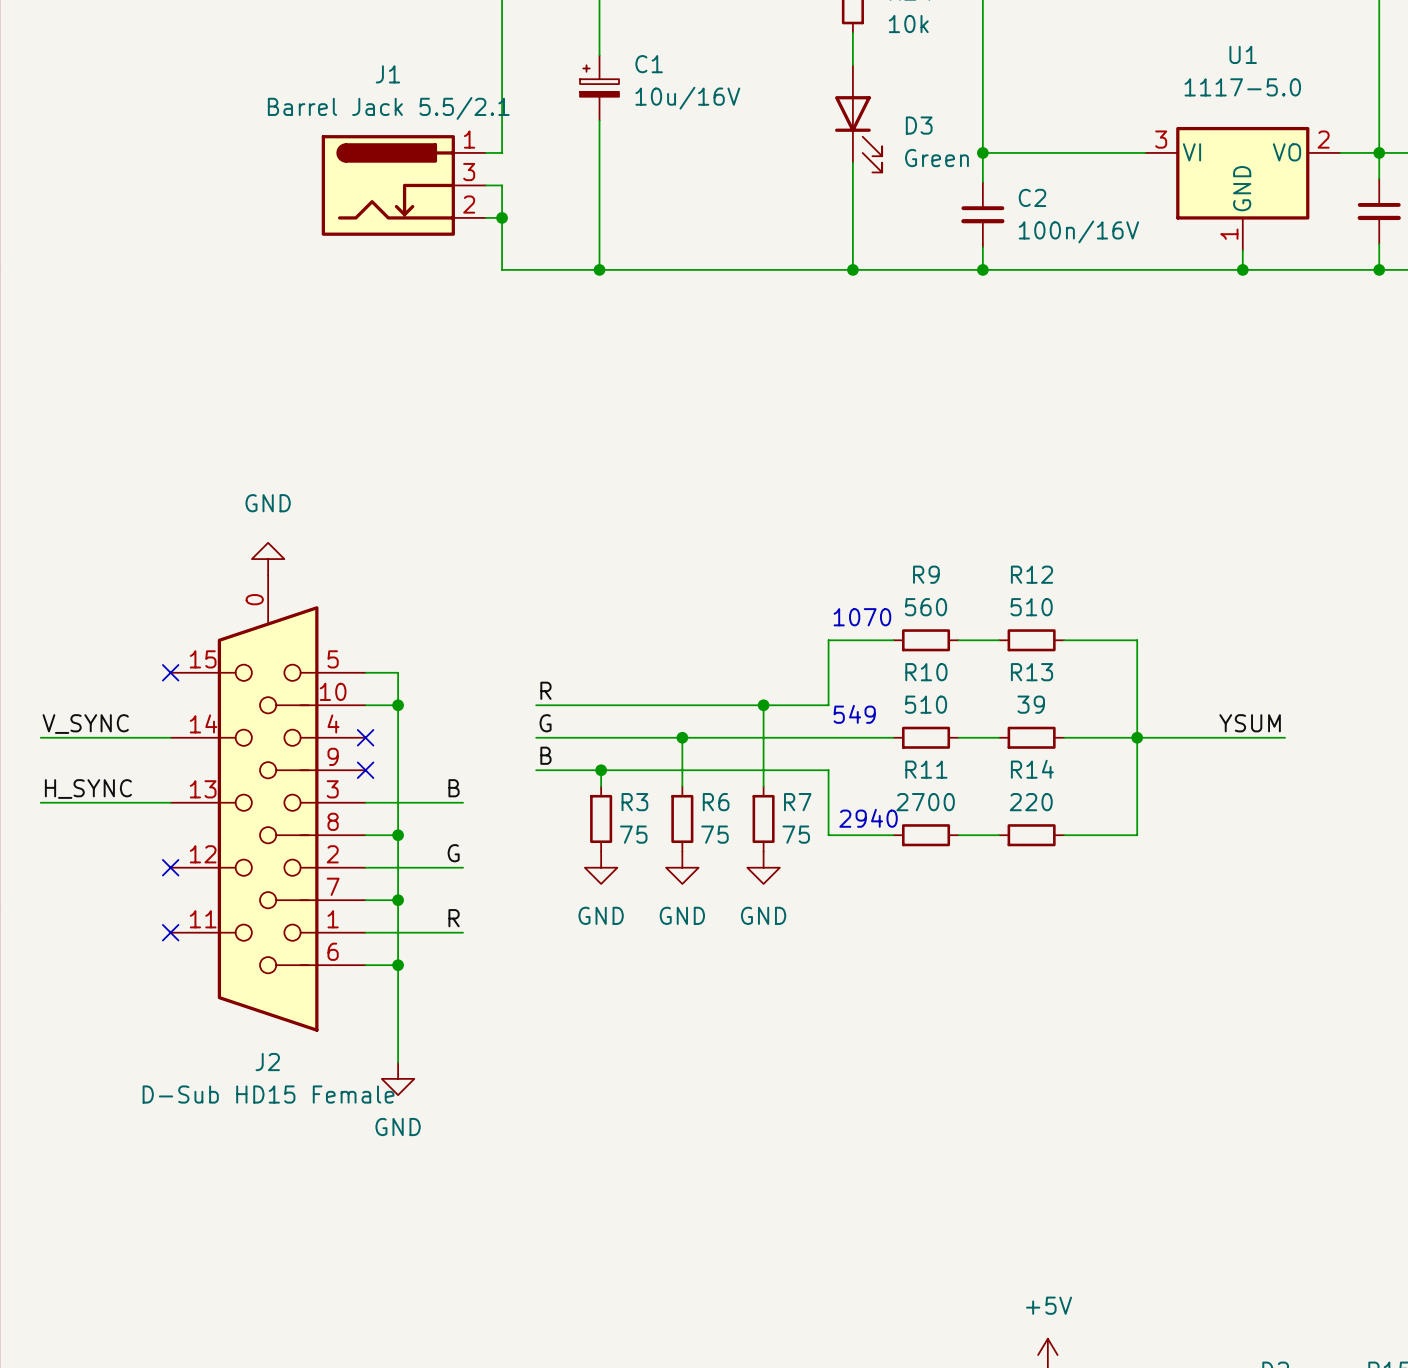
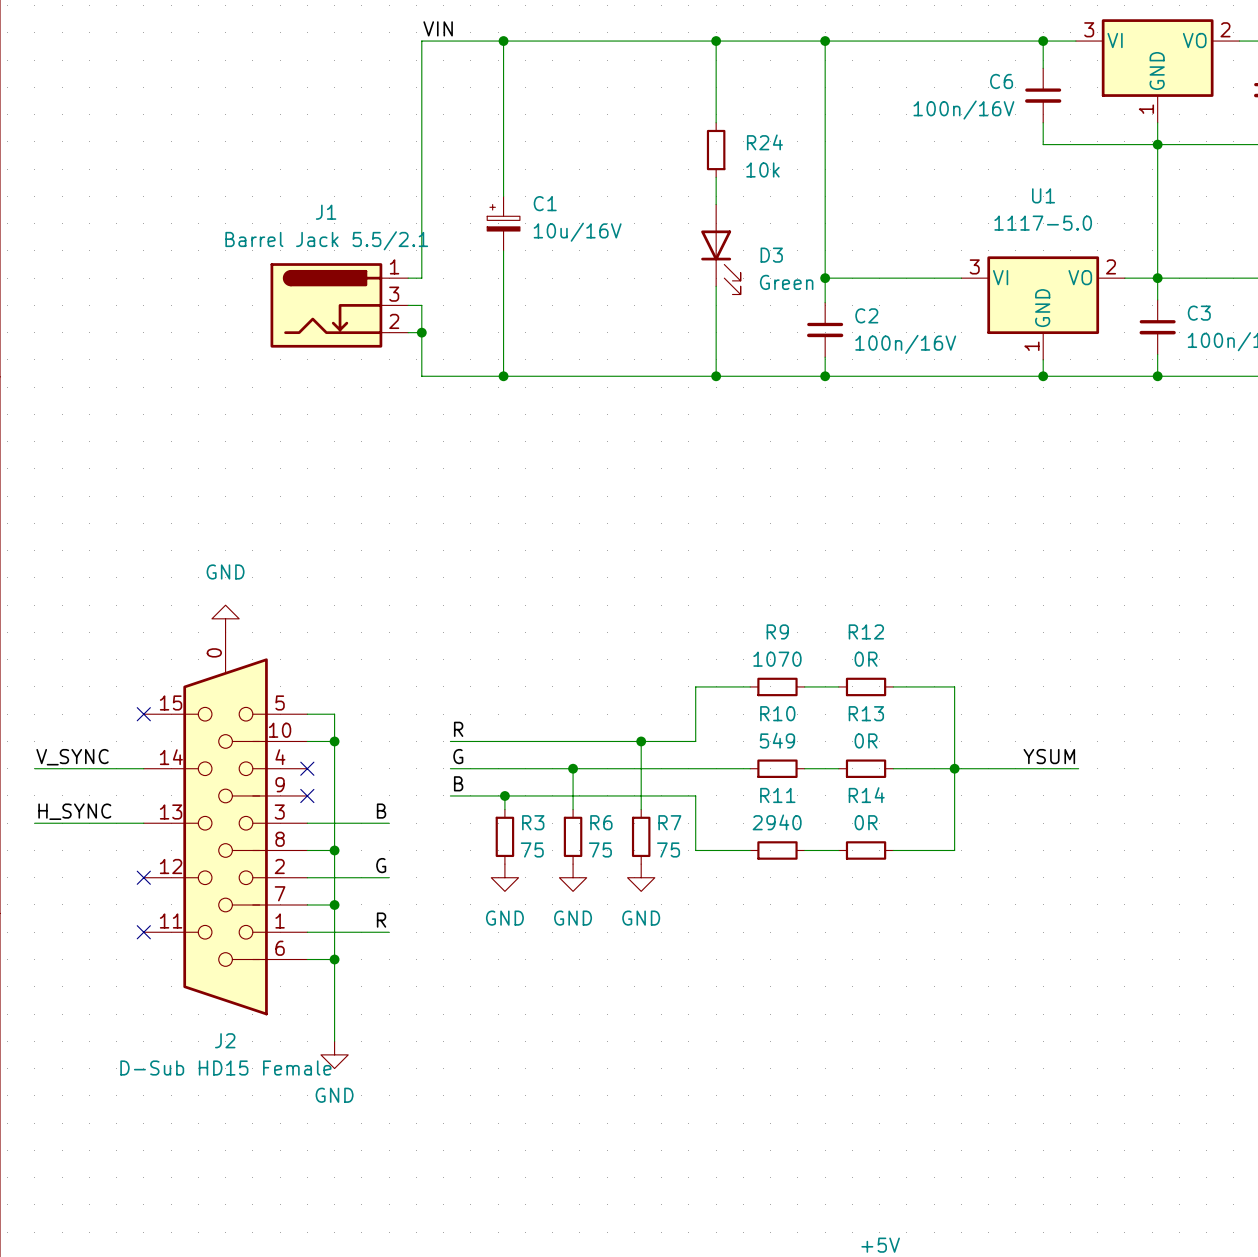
R9 value: 560 (926, 607) -> 1070 (777, 659)
R12 value: 510 (1031, 607) -> 0R (866, 659)
text: 1070 (862, 617) -> none
R10 value: 510 (926, 704) -> 549 (777, 740)
R13 value: 39 (1031, 704) -> 0R (866, 740)
text: 549 (854, 714) -> none
R11 value: 2700 (925, 802) -> 2940 (777, 822)
R14 value: 220 (1031, 802) -> 0R (866, 822)
text: 2940 (868, 818) -> none

